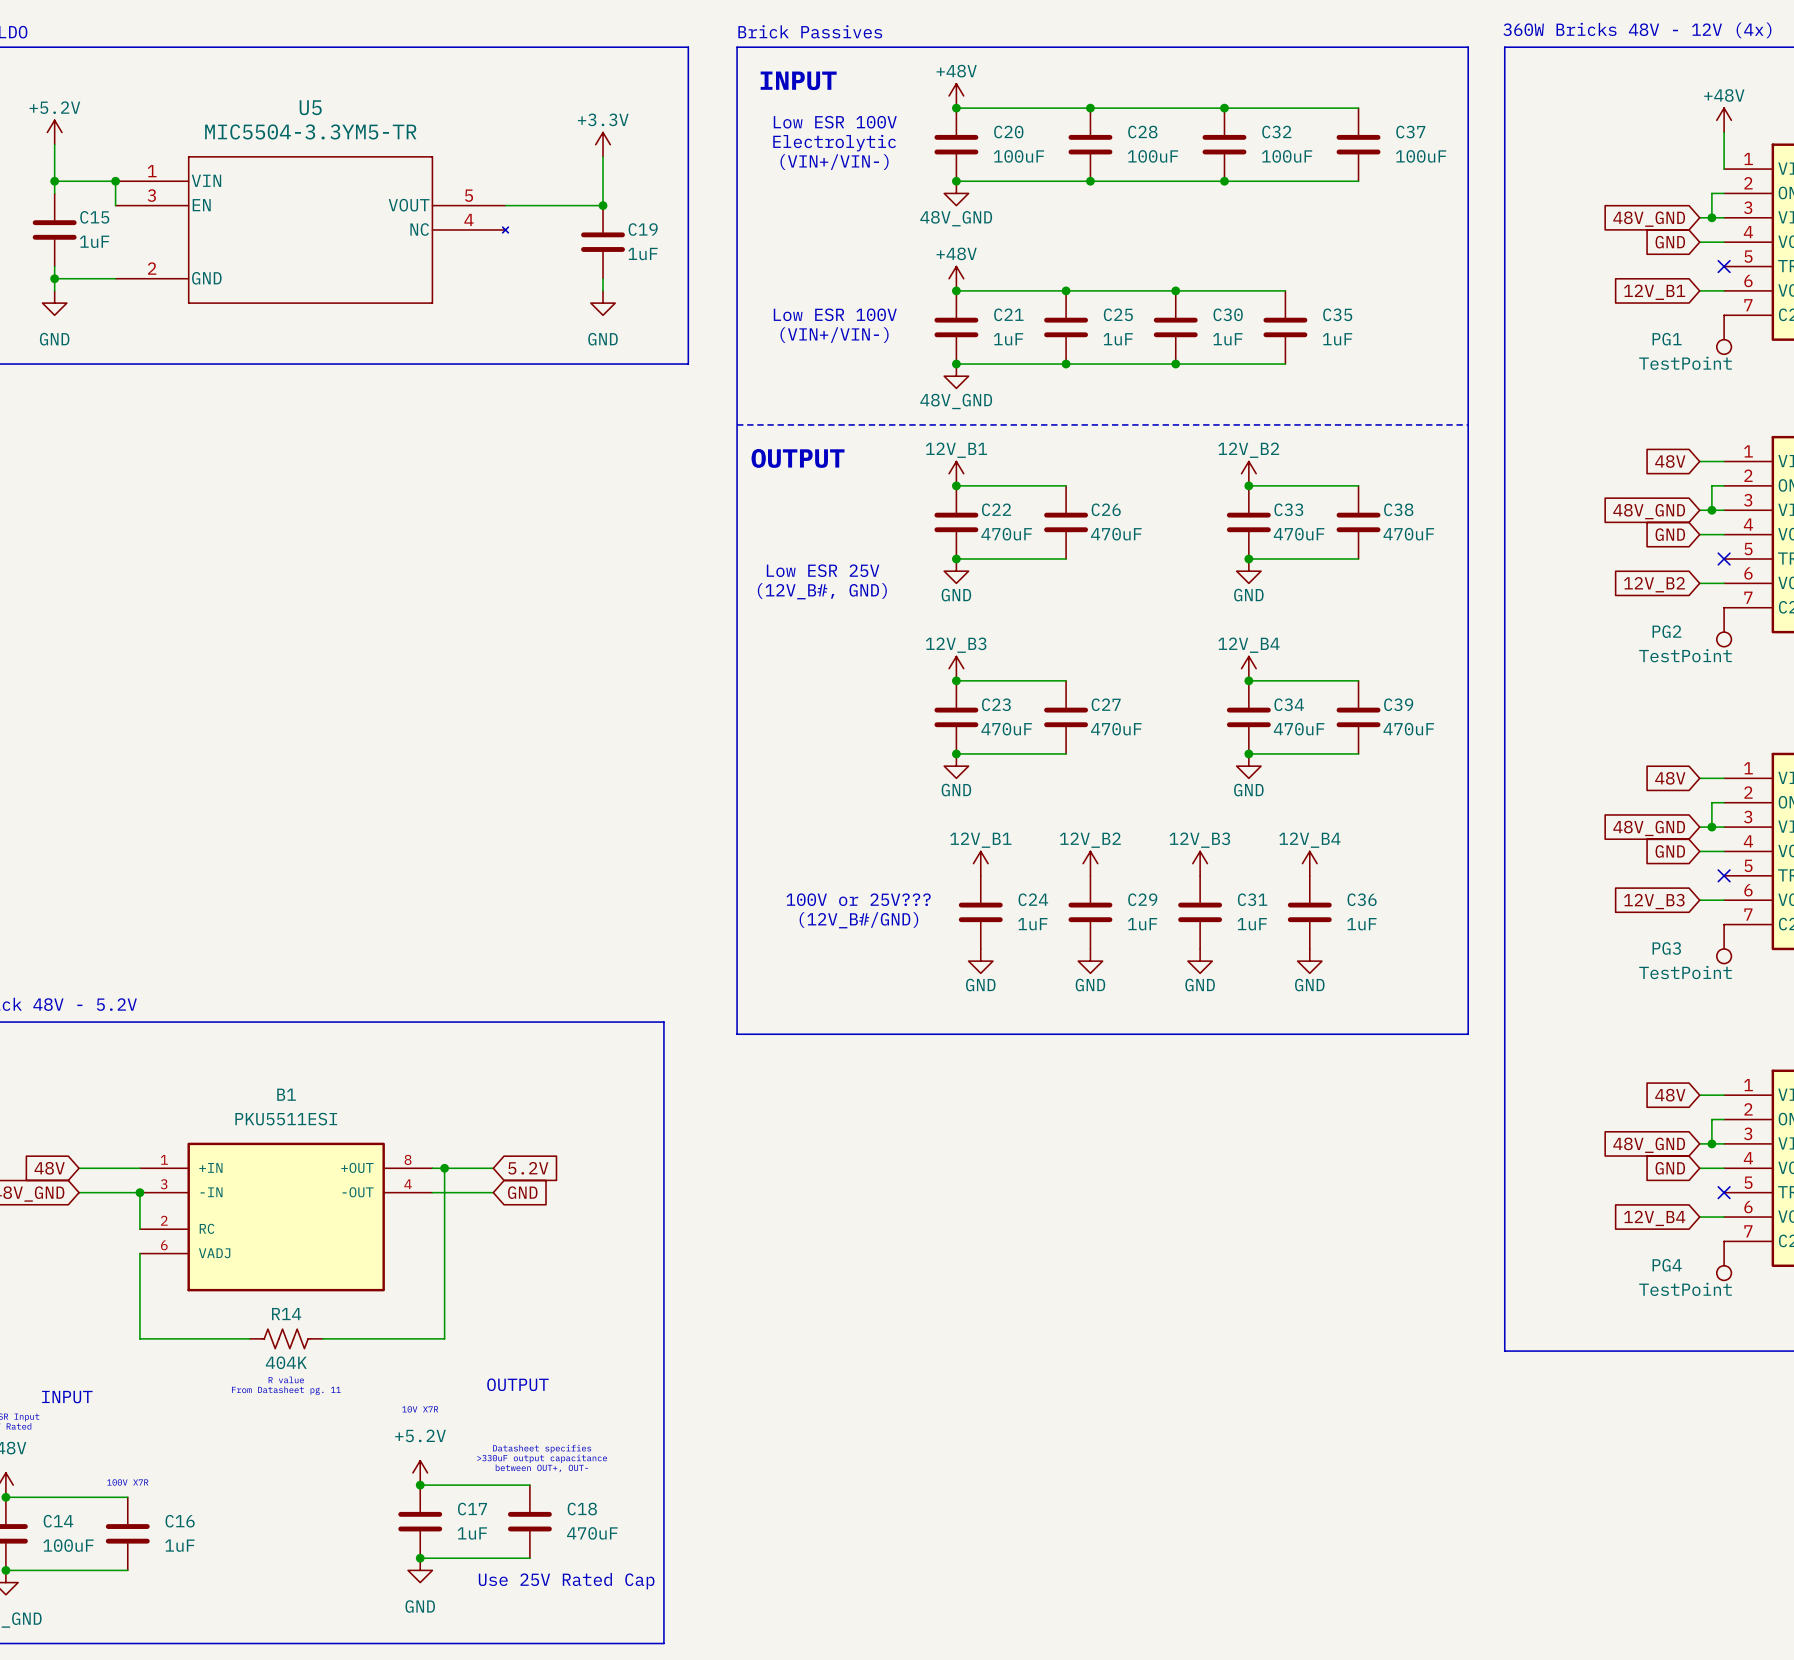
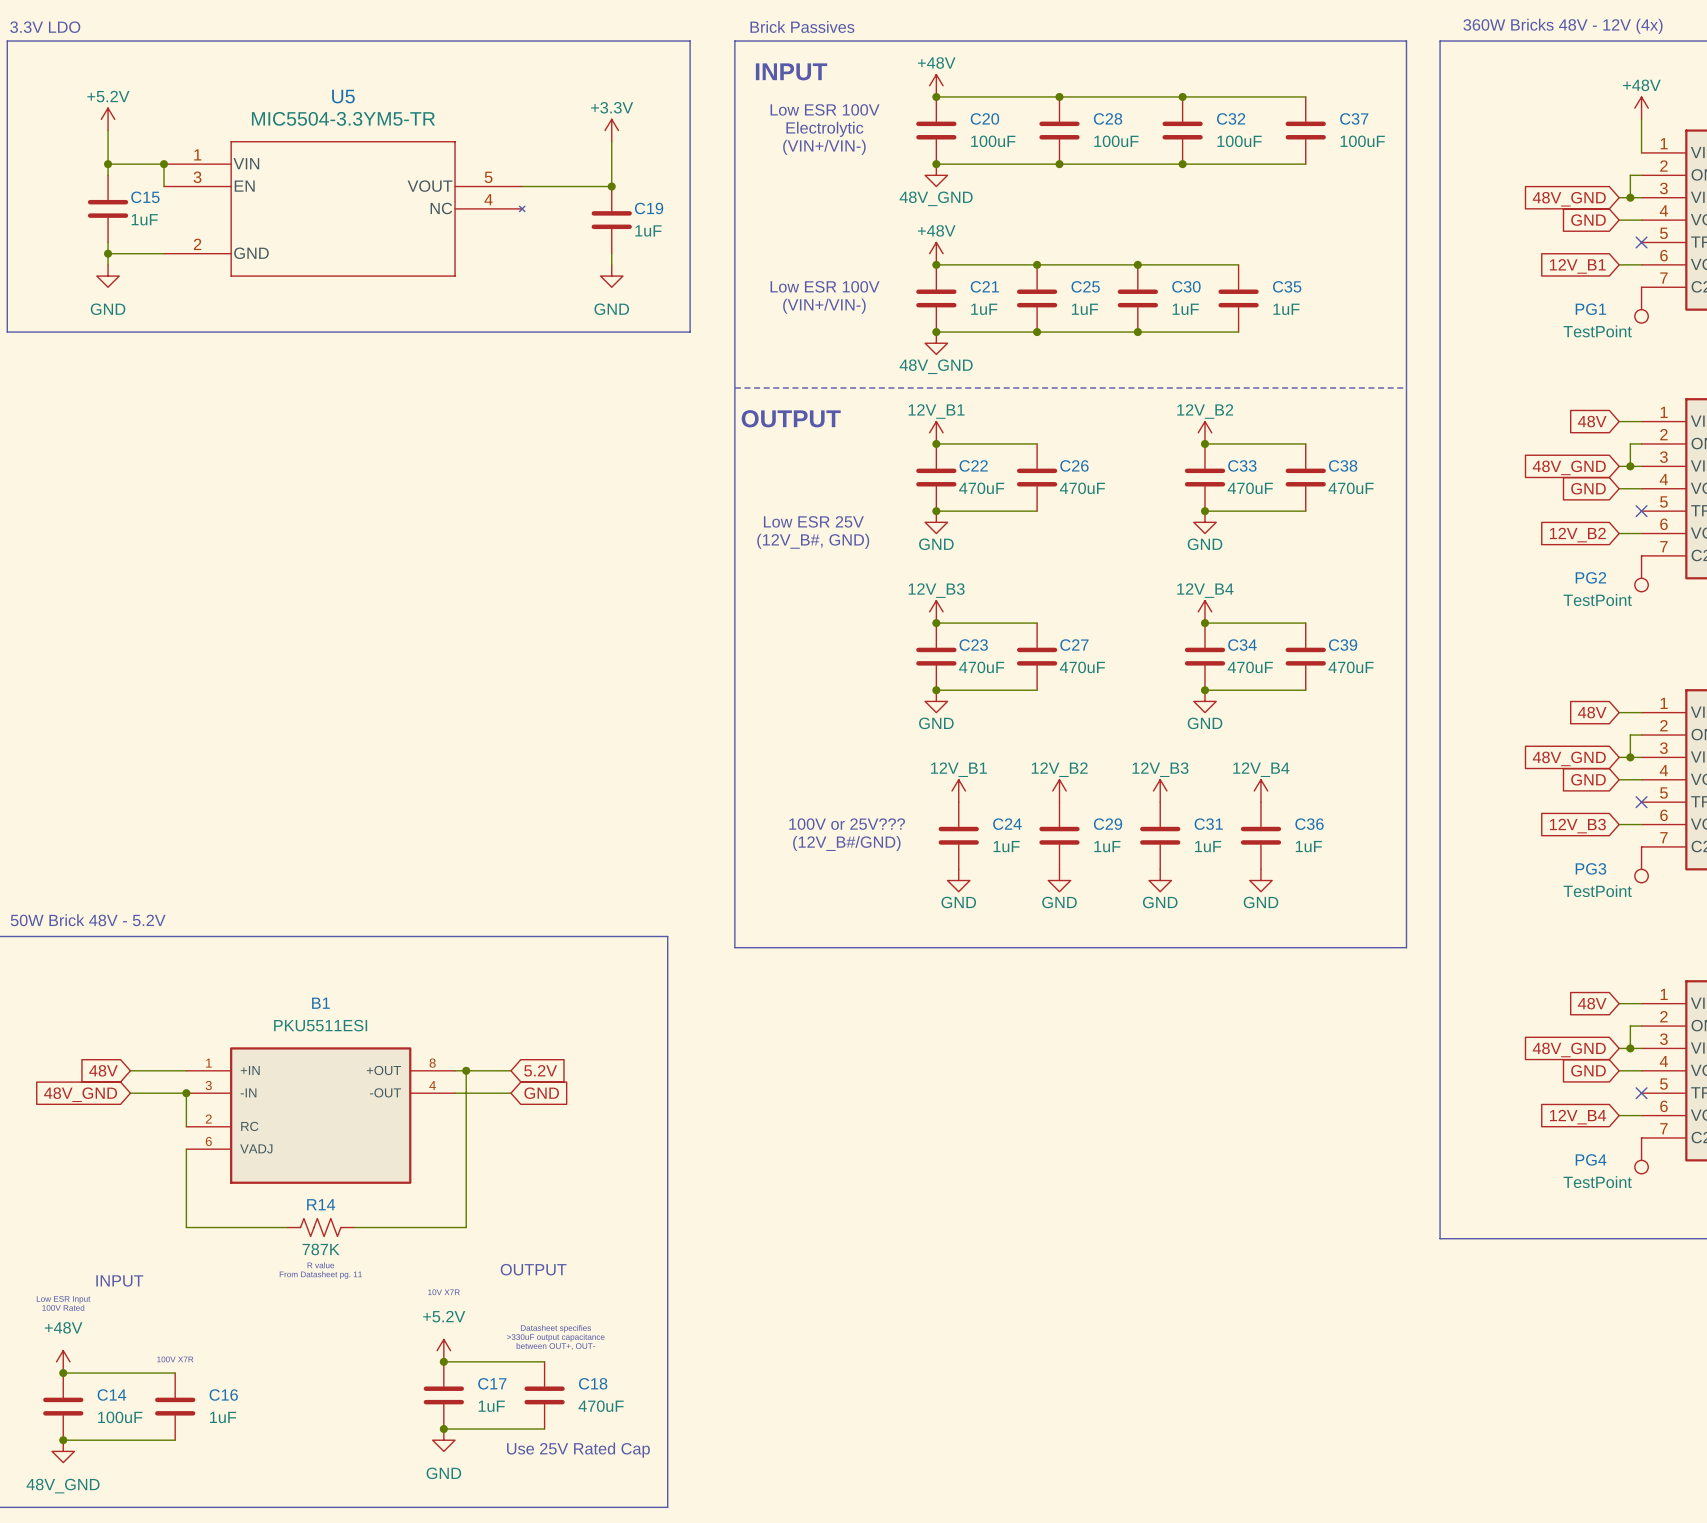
R14 value: 404K (286, 1362) -> 787K (321, 1249)

